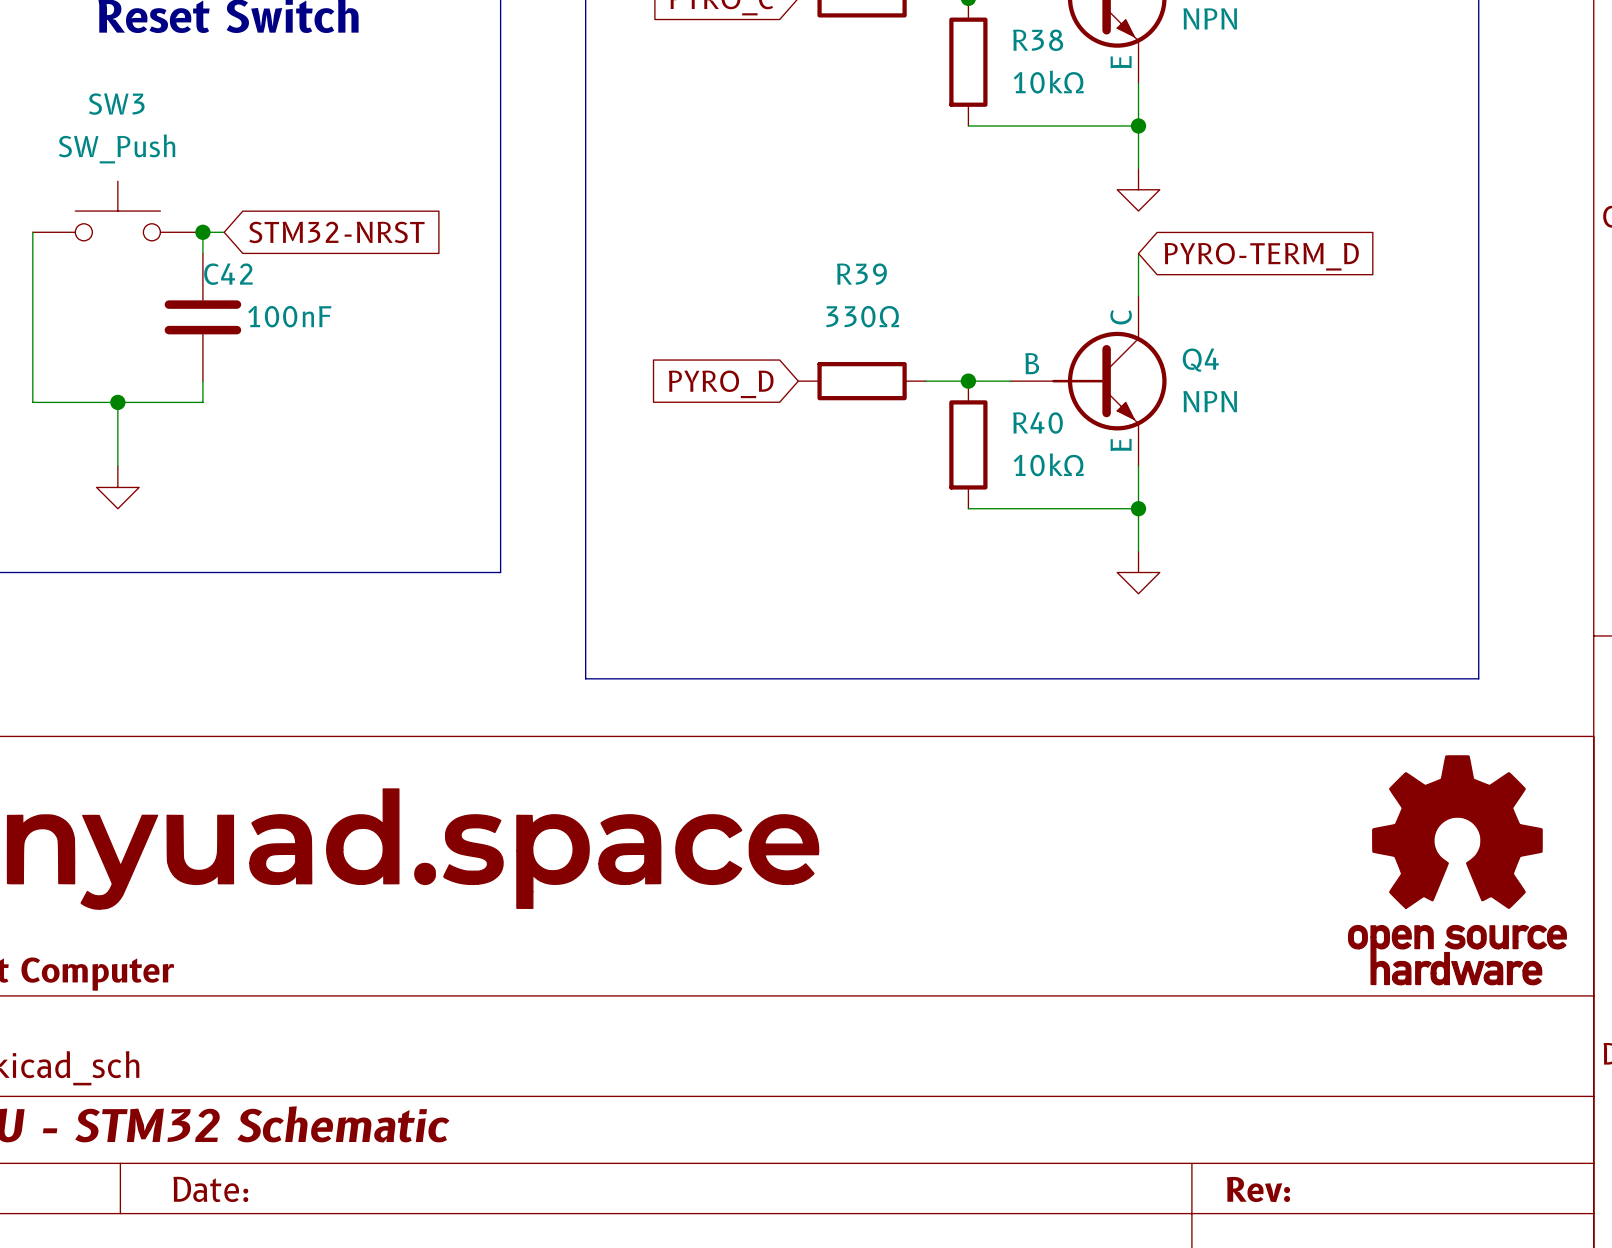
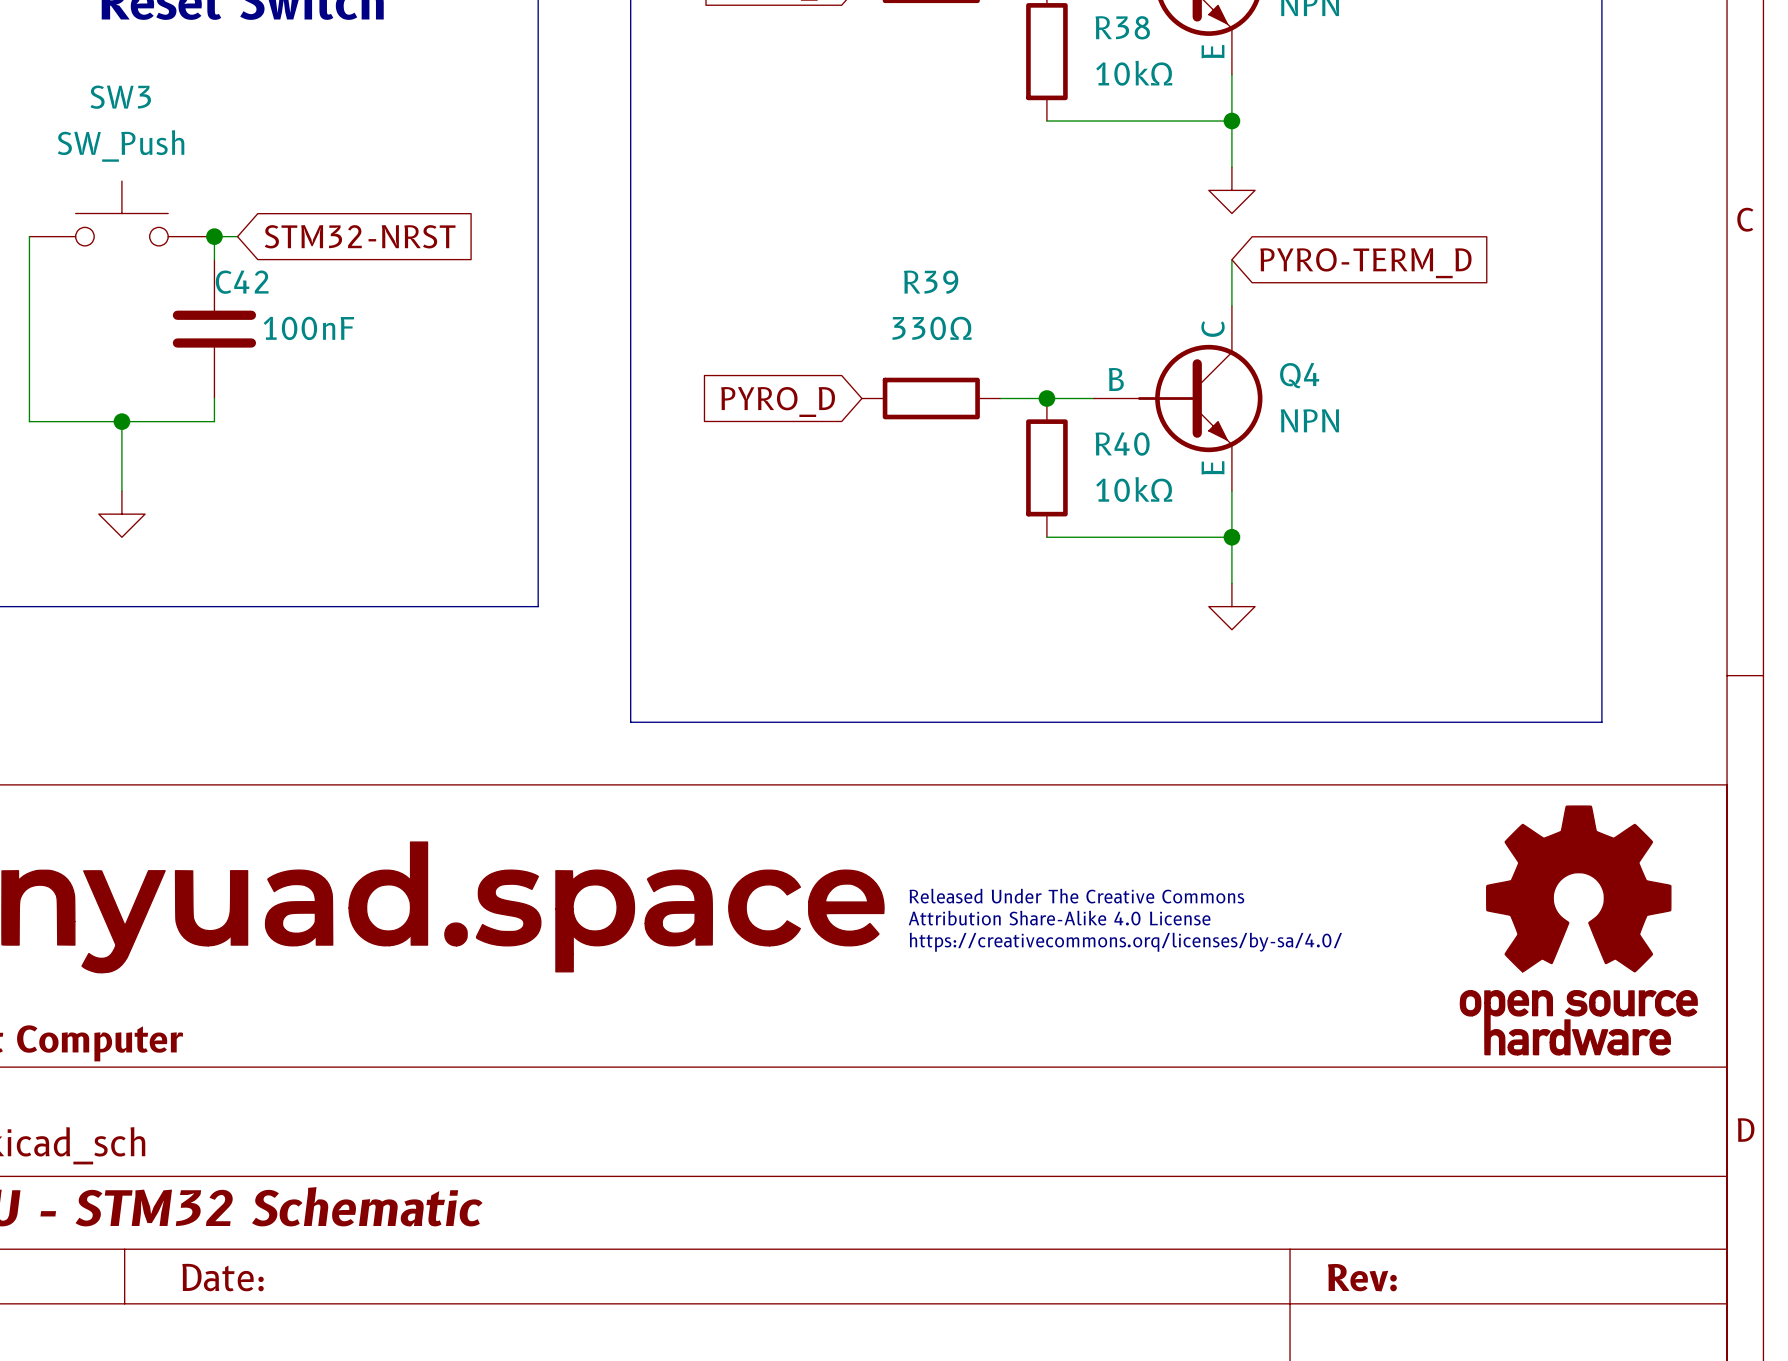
text: none -> Released Under The Creative Commons (1076, 896)
text: none -> Attribution Share-Alike 4.0 License (1059, 918)
text: none -> https://creativecommons.orq/licenses/by-sa/4.0/ (1125, 942)

